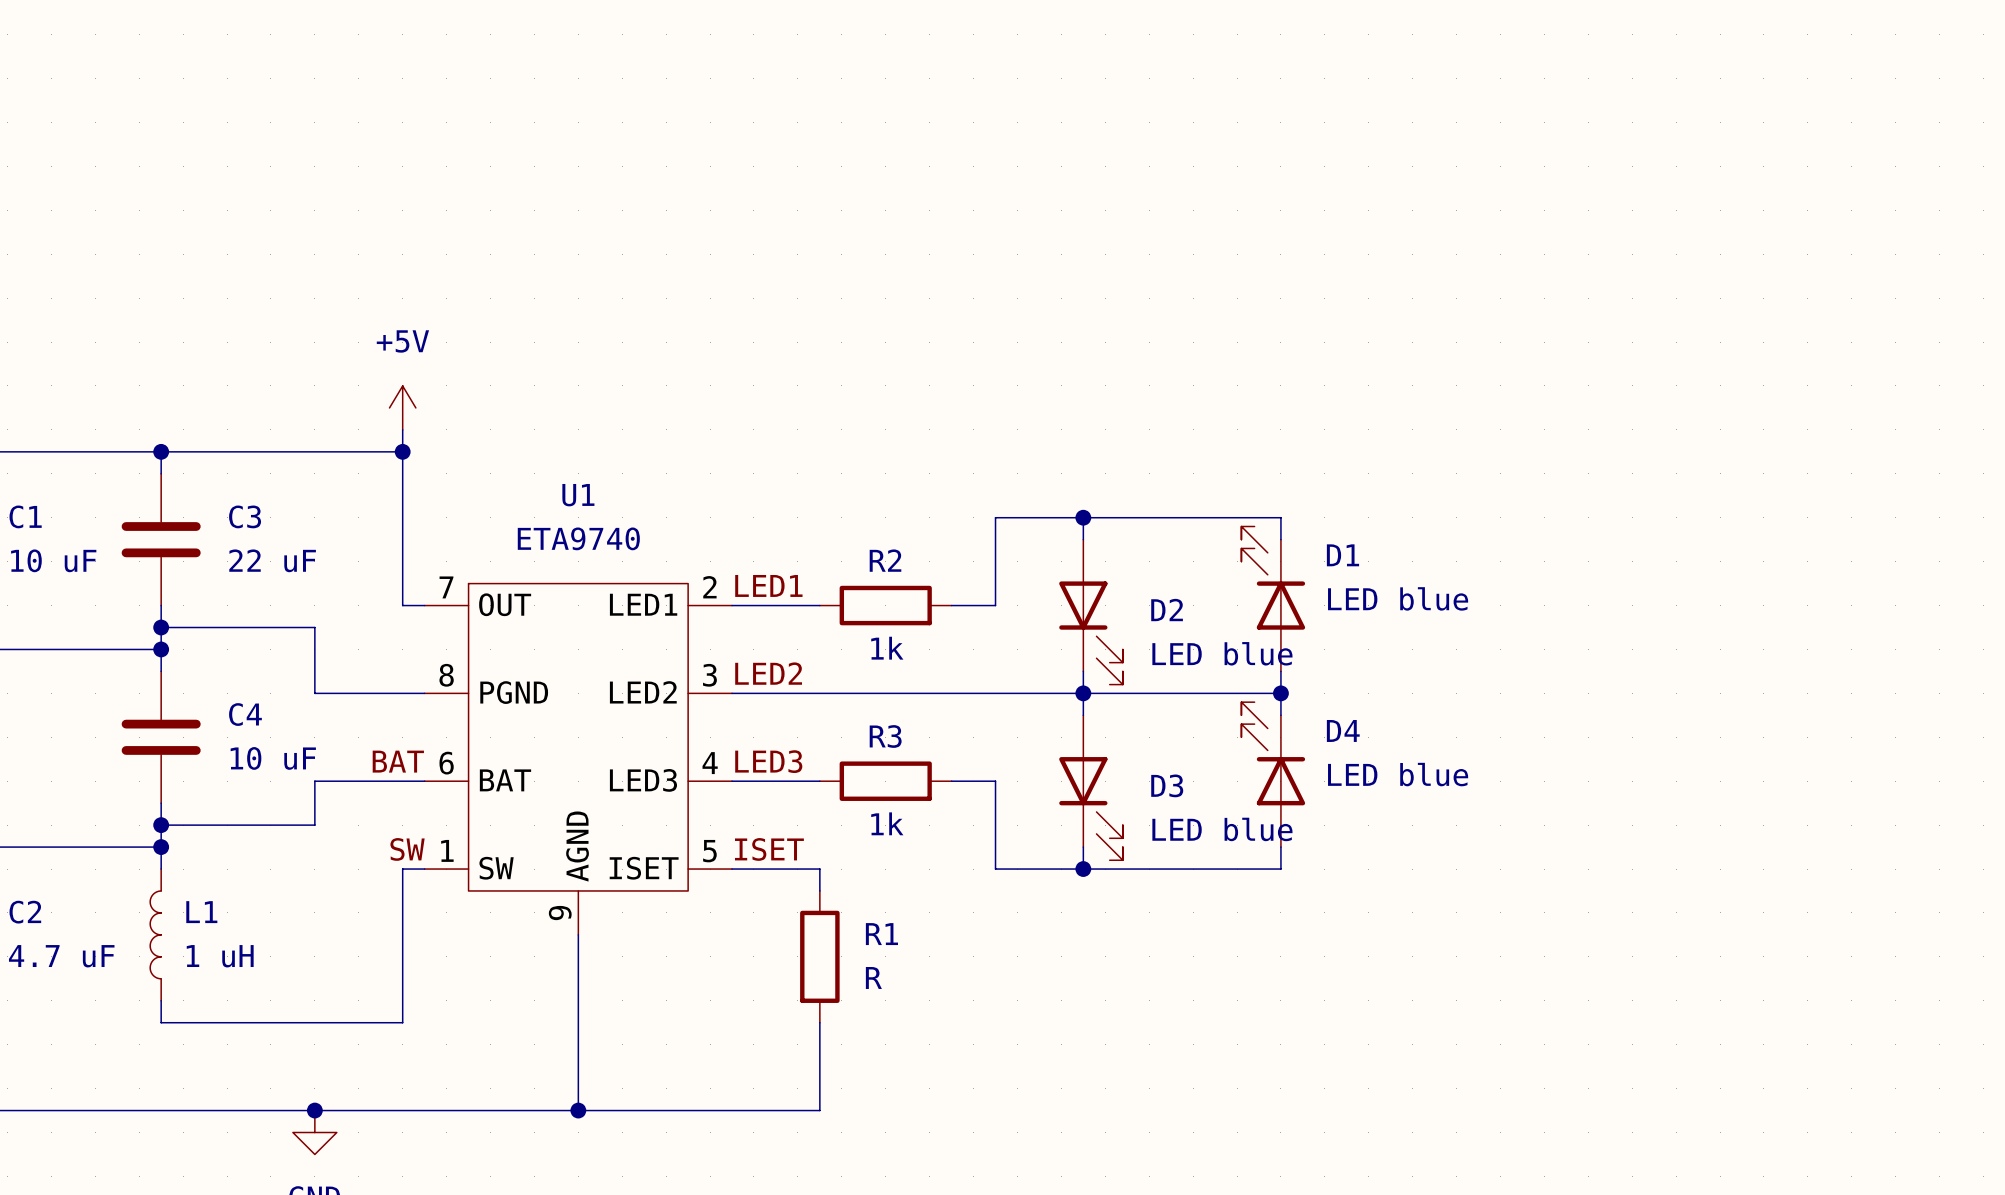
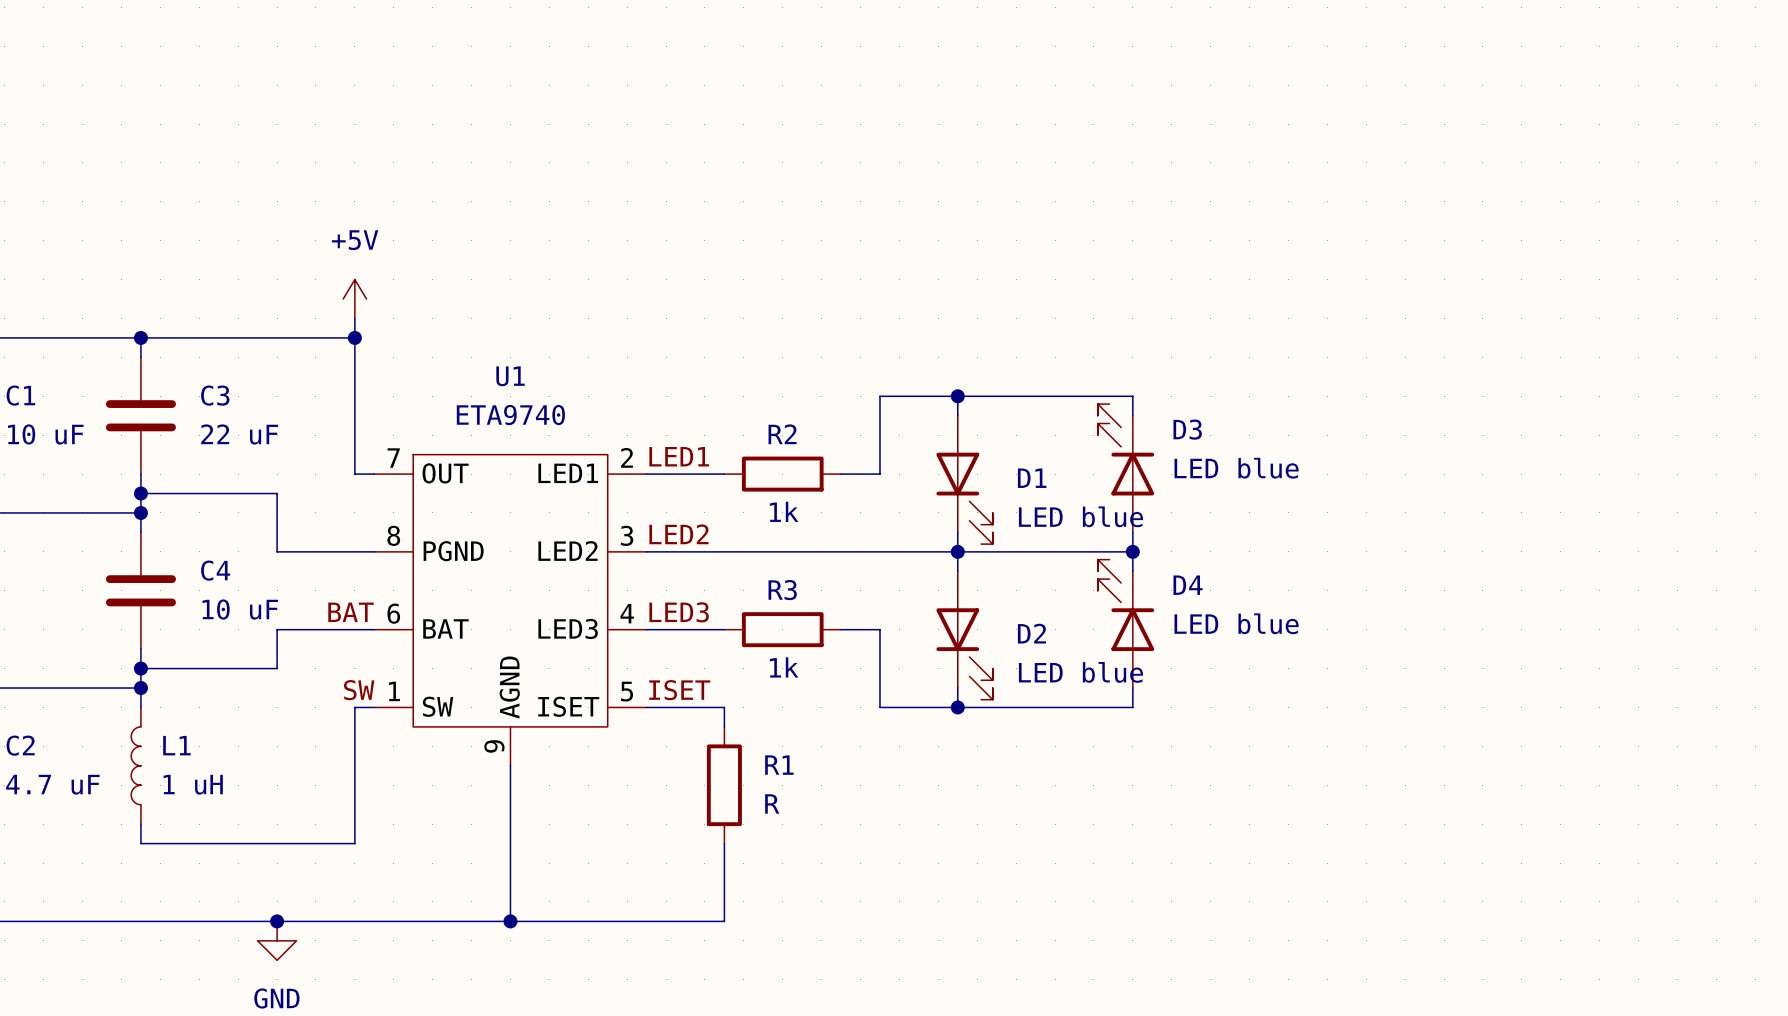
D1 name: D1 (1342, 555) -> D3 (1187, 429)
D2 name: D2 (1167, 610) -> D1 (1032, 478)
D3 name: D3 (1167, 785) -> D2 (1031, 633)

